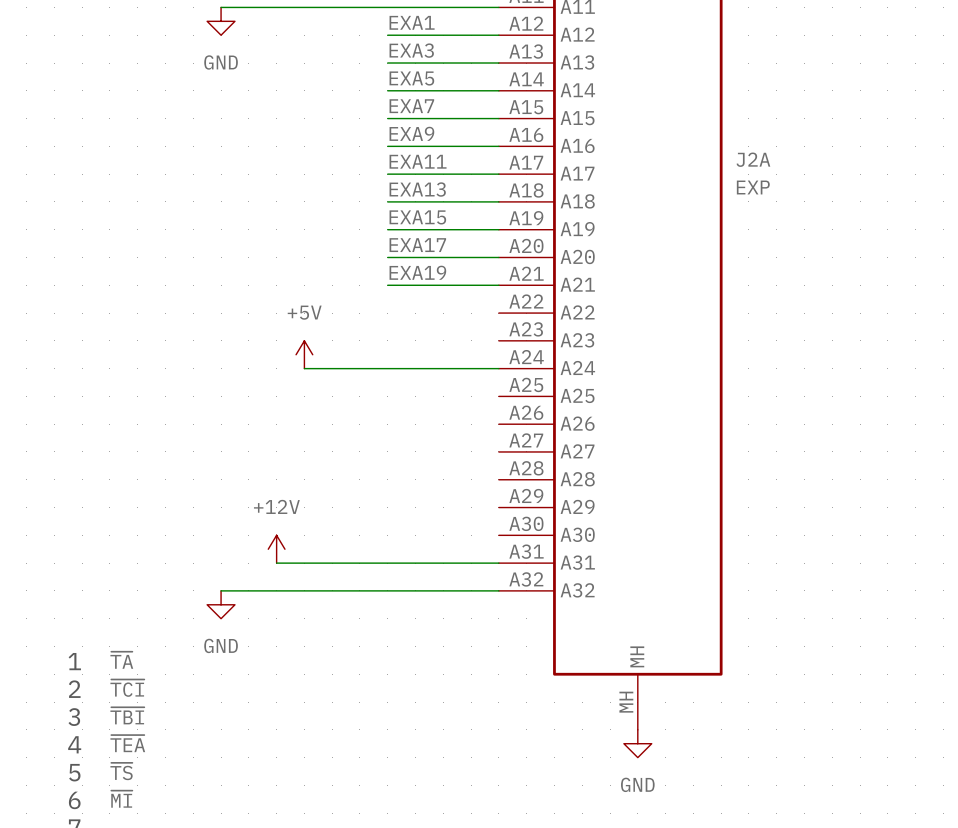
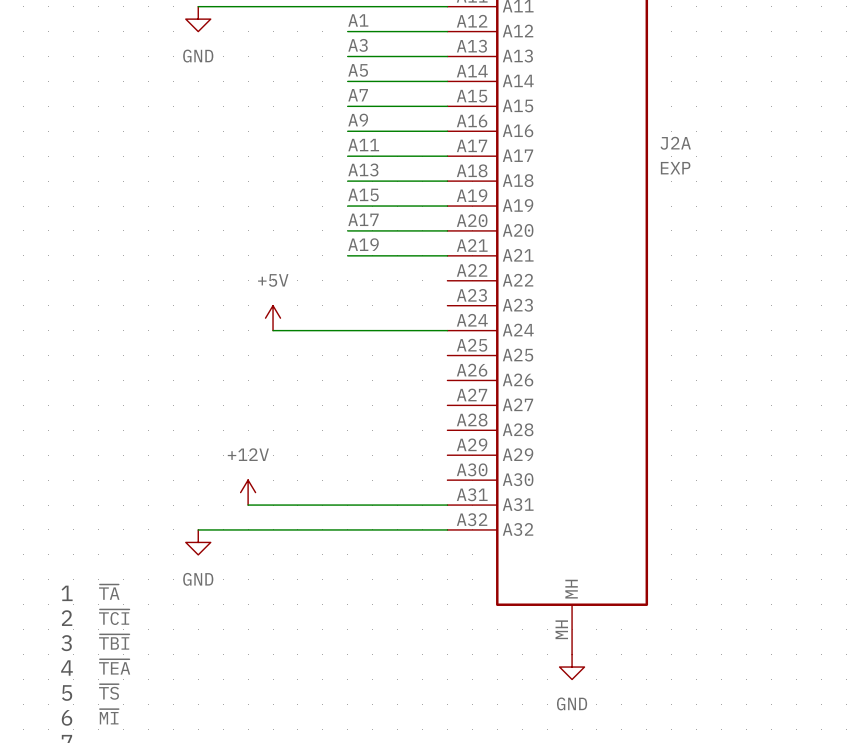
label: EXA1 (412, 22) -> A1 (358, 20)
label: EXA3 (411, 50) -> A3 (358, 45)
label: EXA5 (411, 78) -> A5 (358, 70)
label: EXA7 (411, 106) -> A7 (358, 95)
label: EXA9 (411, 133) -> A9 (358, 120)
label: EXA11 (418, 161) -> A11 (363, 145)
label: EXA13 (417, 189) -> A13 (363, 169)
label: EXA15 (417, 217) -> A15 (363, 195)
label: EXA17 (417, 245) -> A17 (363, 219)
label: EXA19 (417, 272) -> A19 (363, 244)

